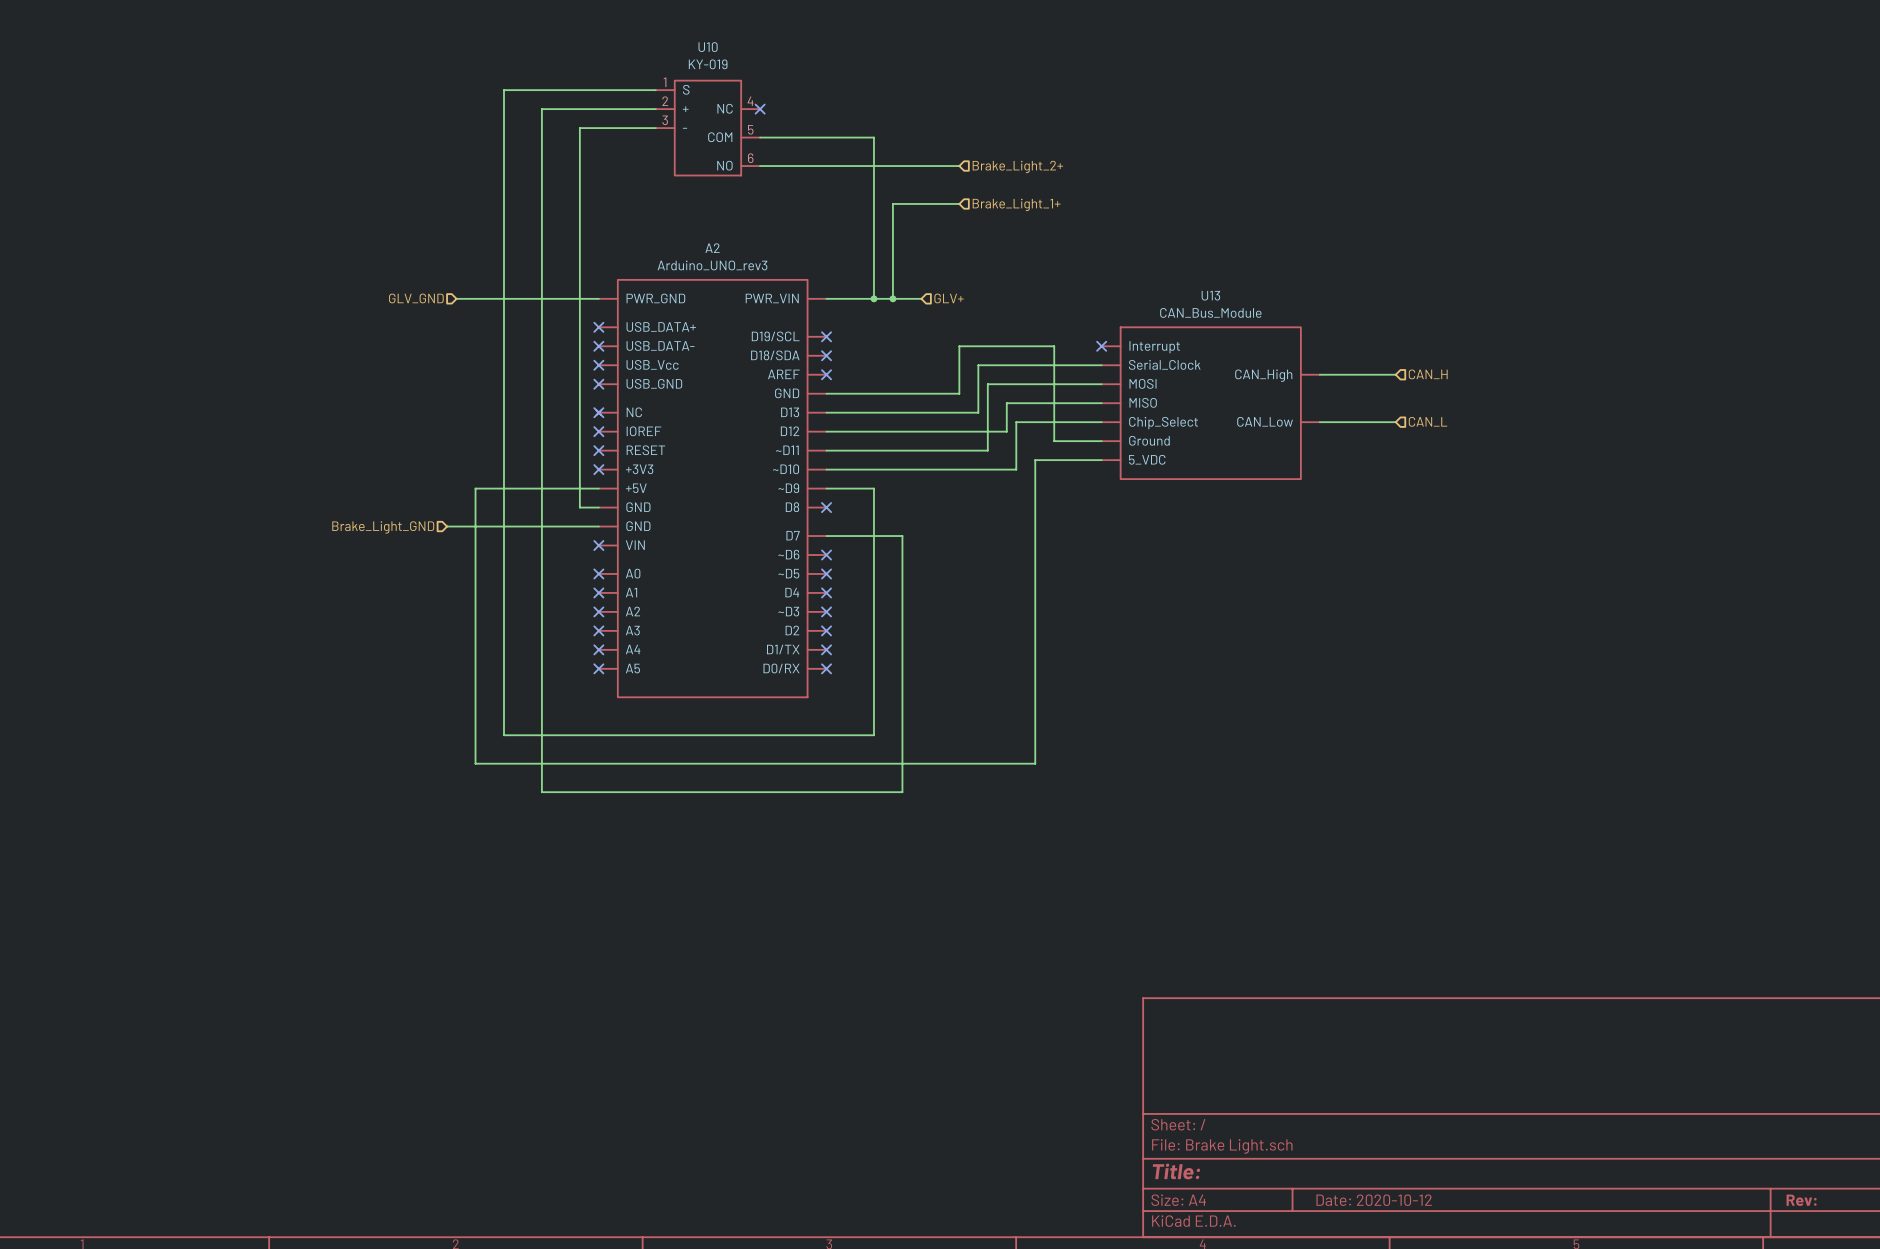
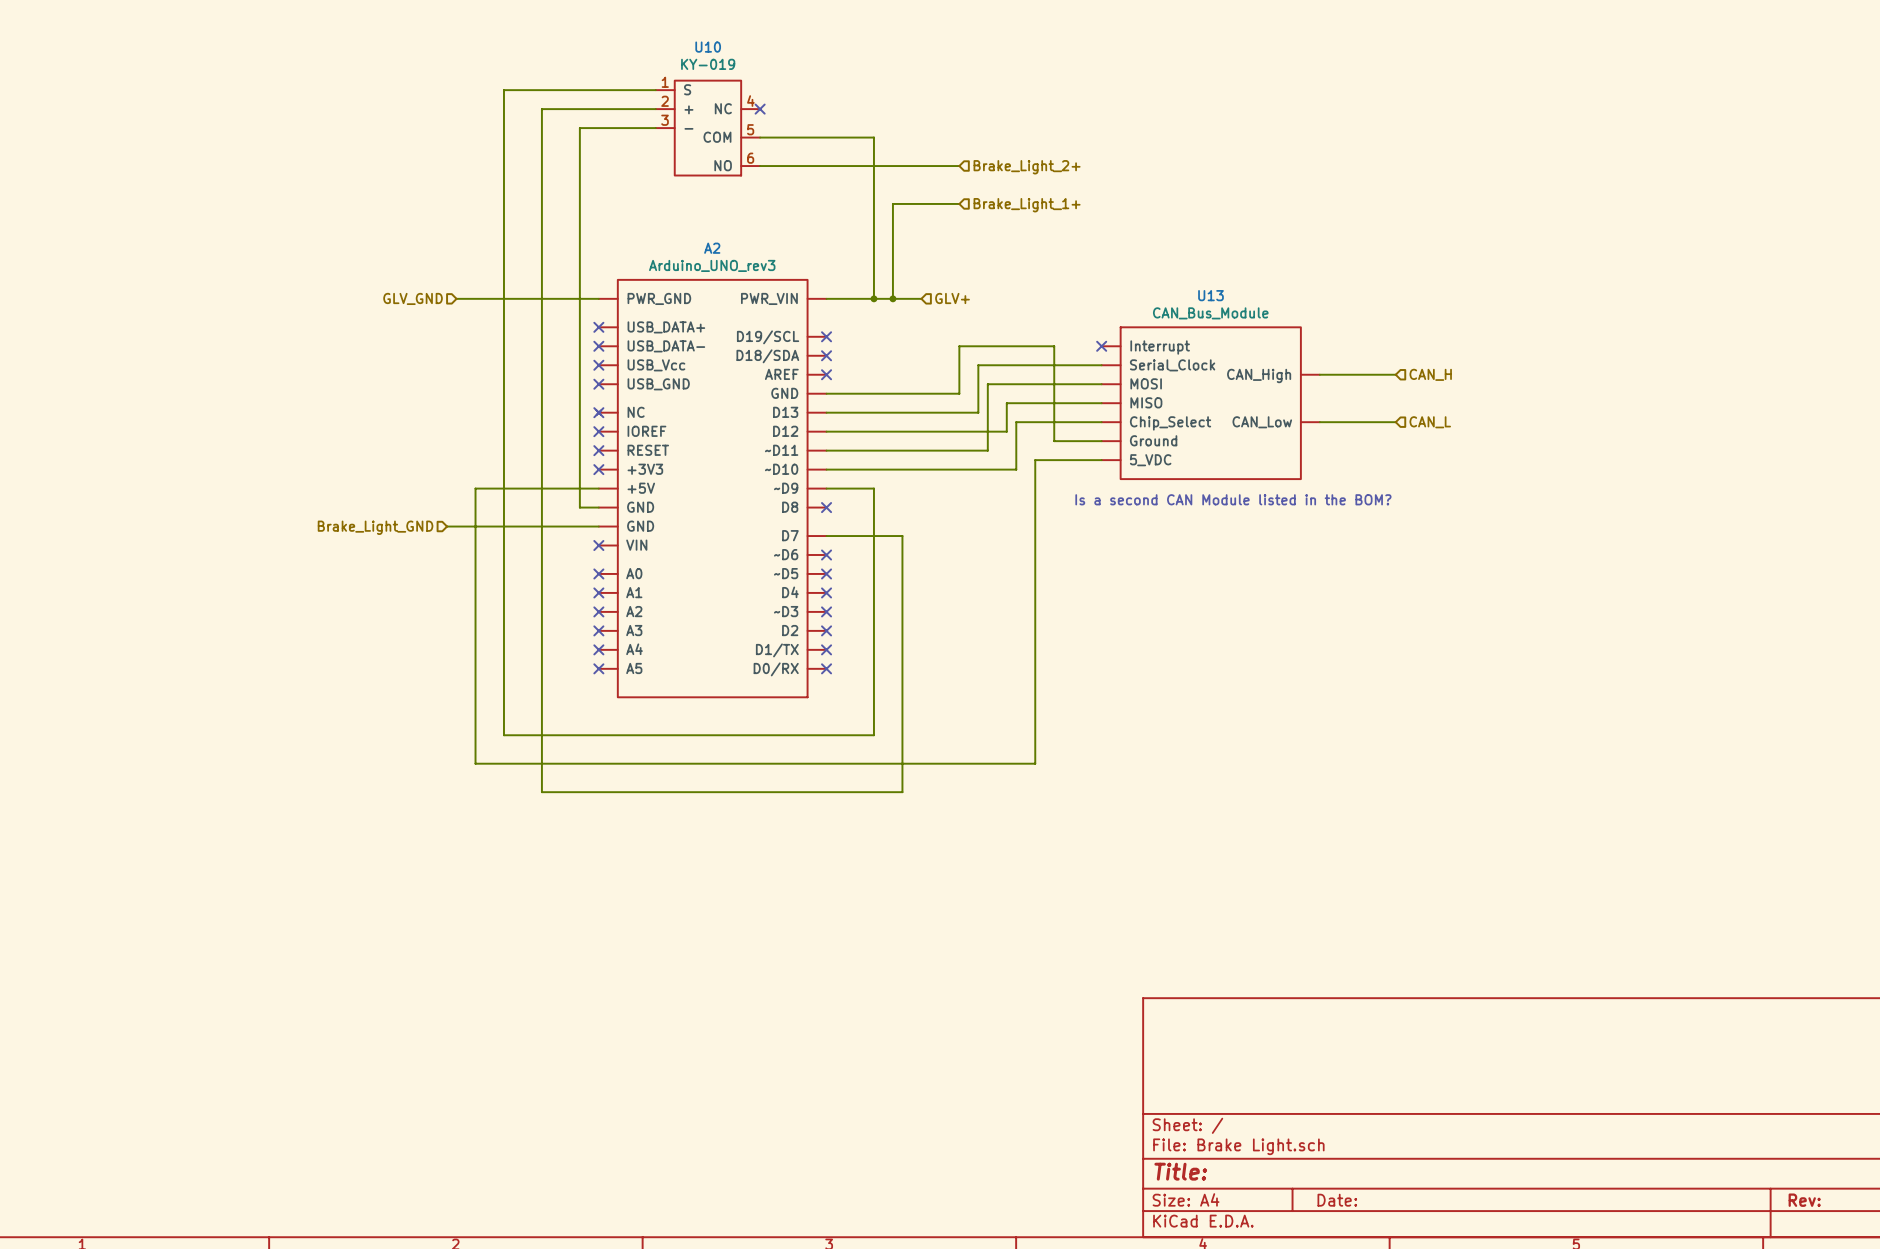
text: none -> Is a second CAN Module listed in the BOM? (1233, 499)
title block: Date: 2020-10-12 (1374, 1200) -> Date: (1337, 1200)

